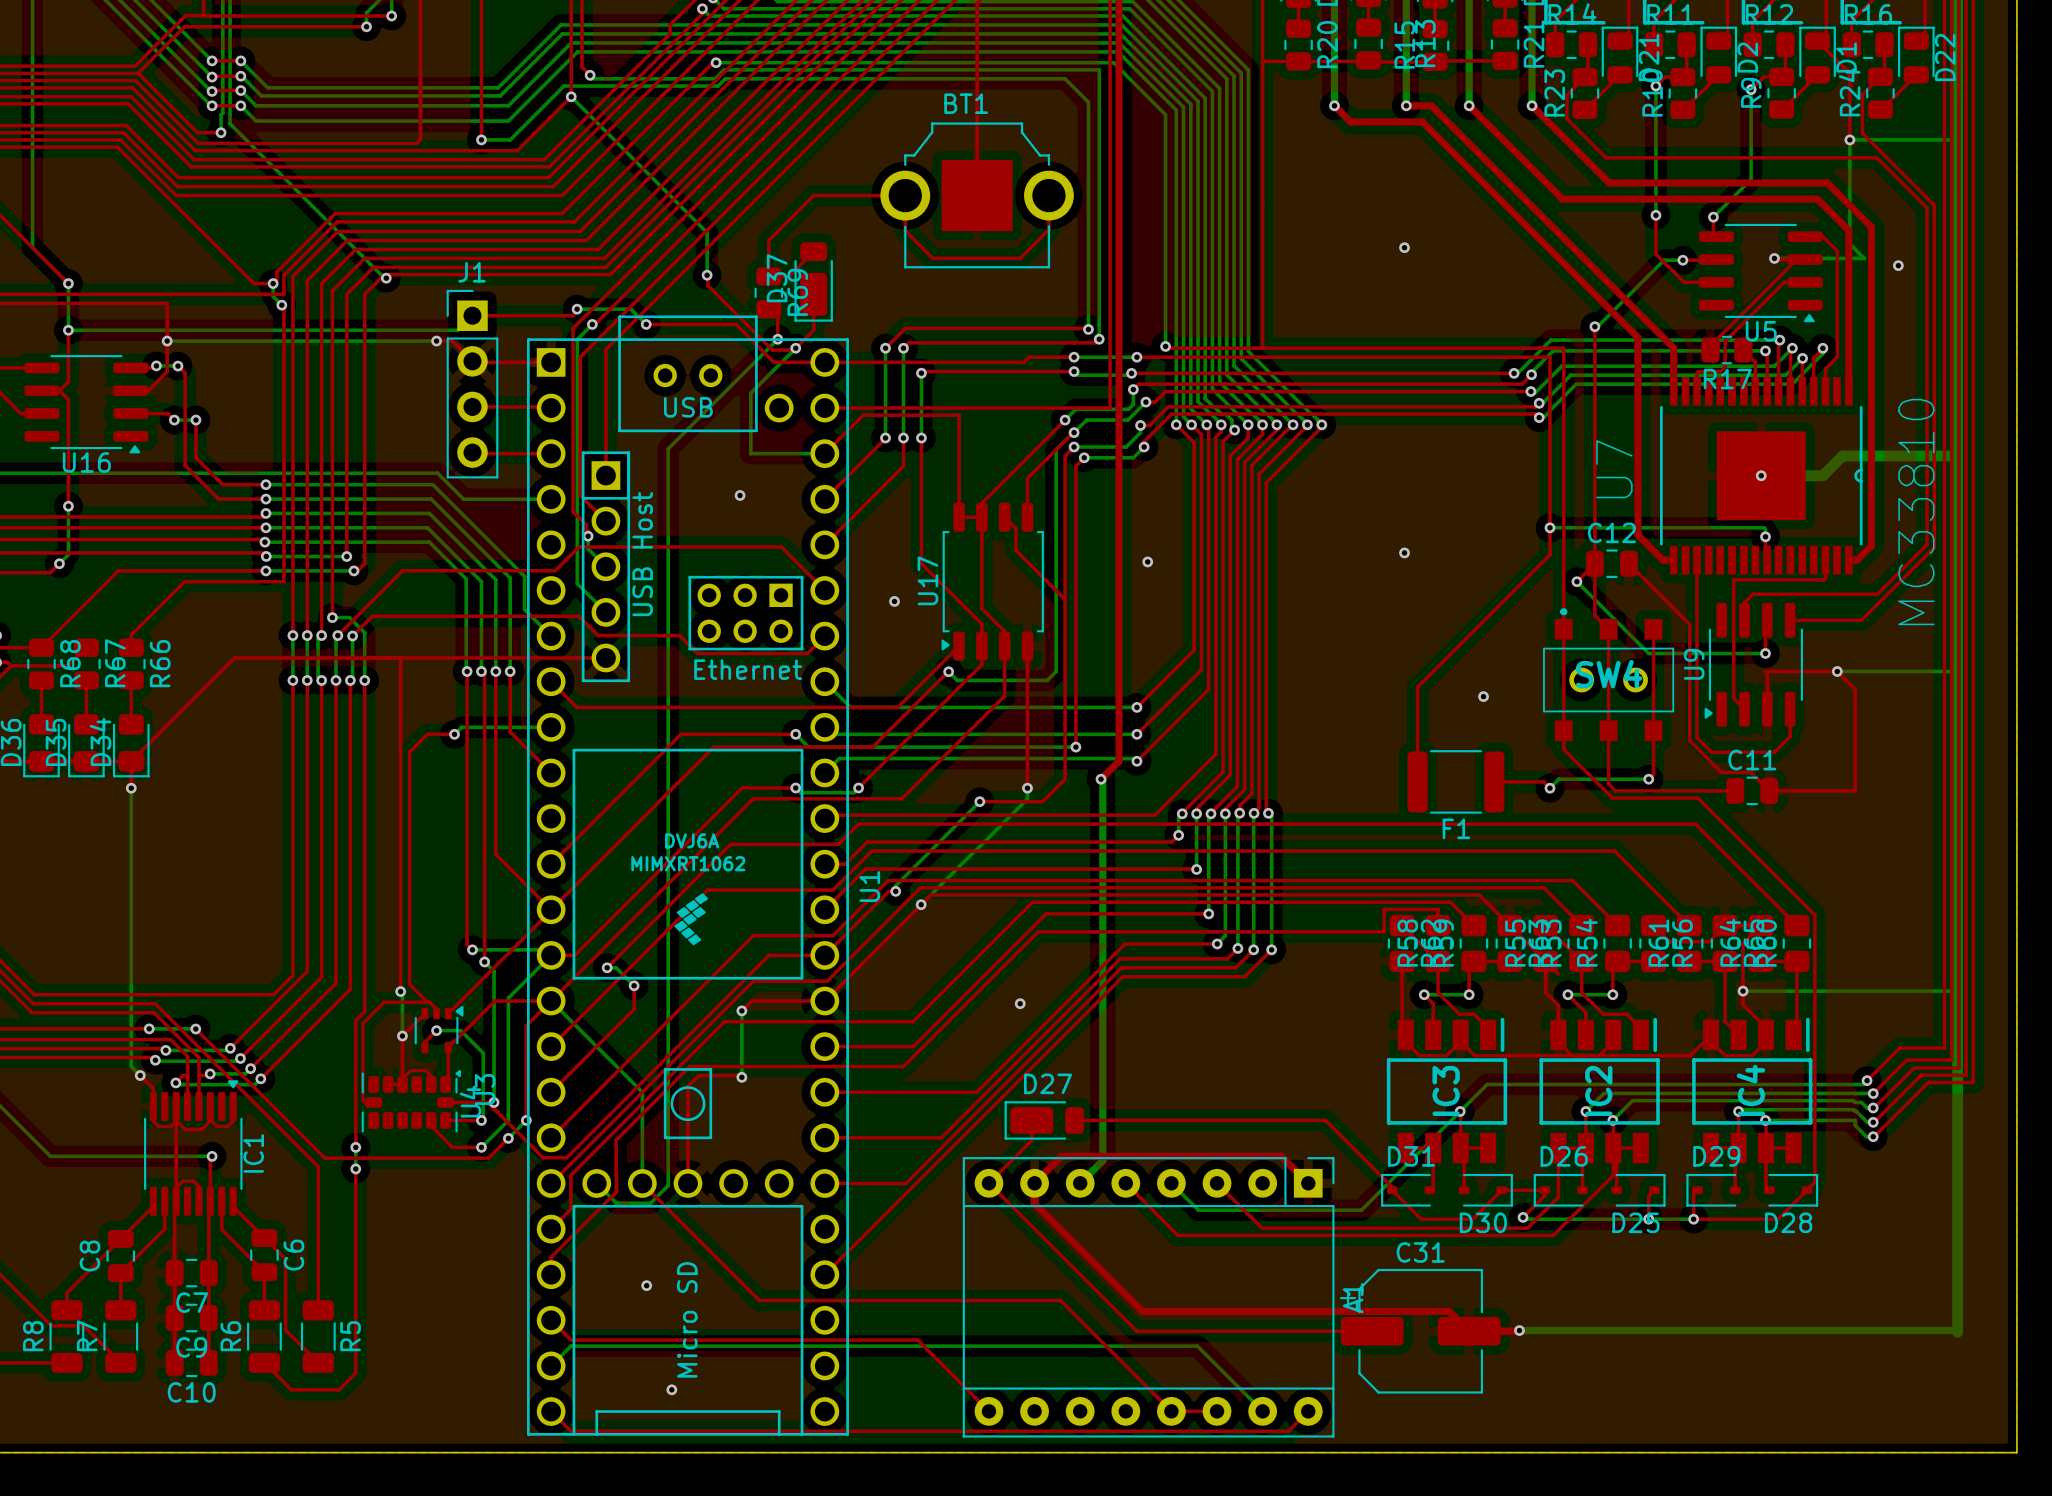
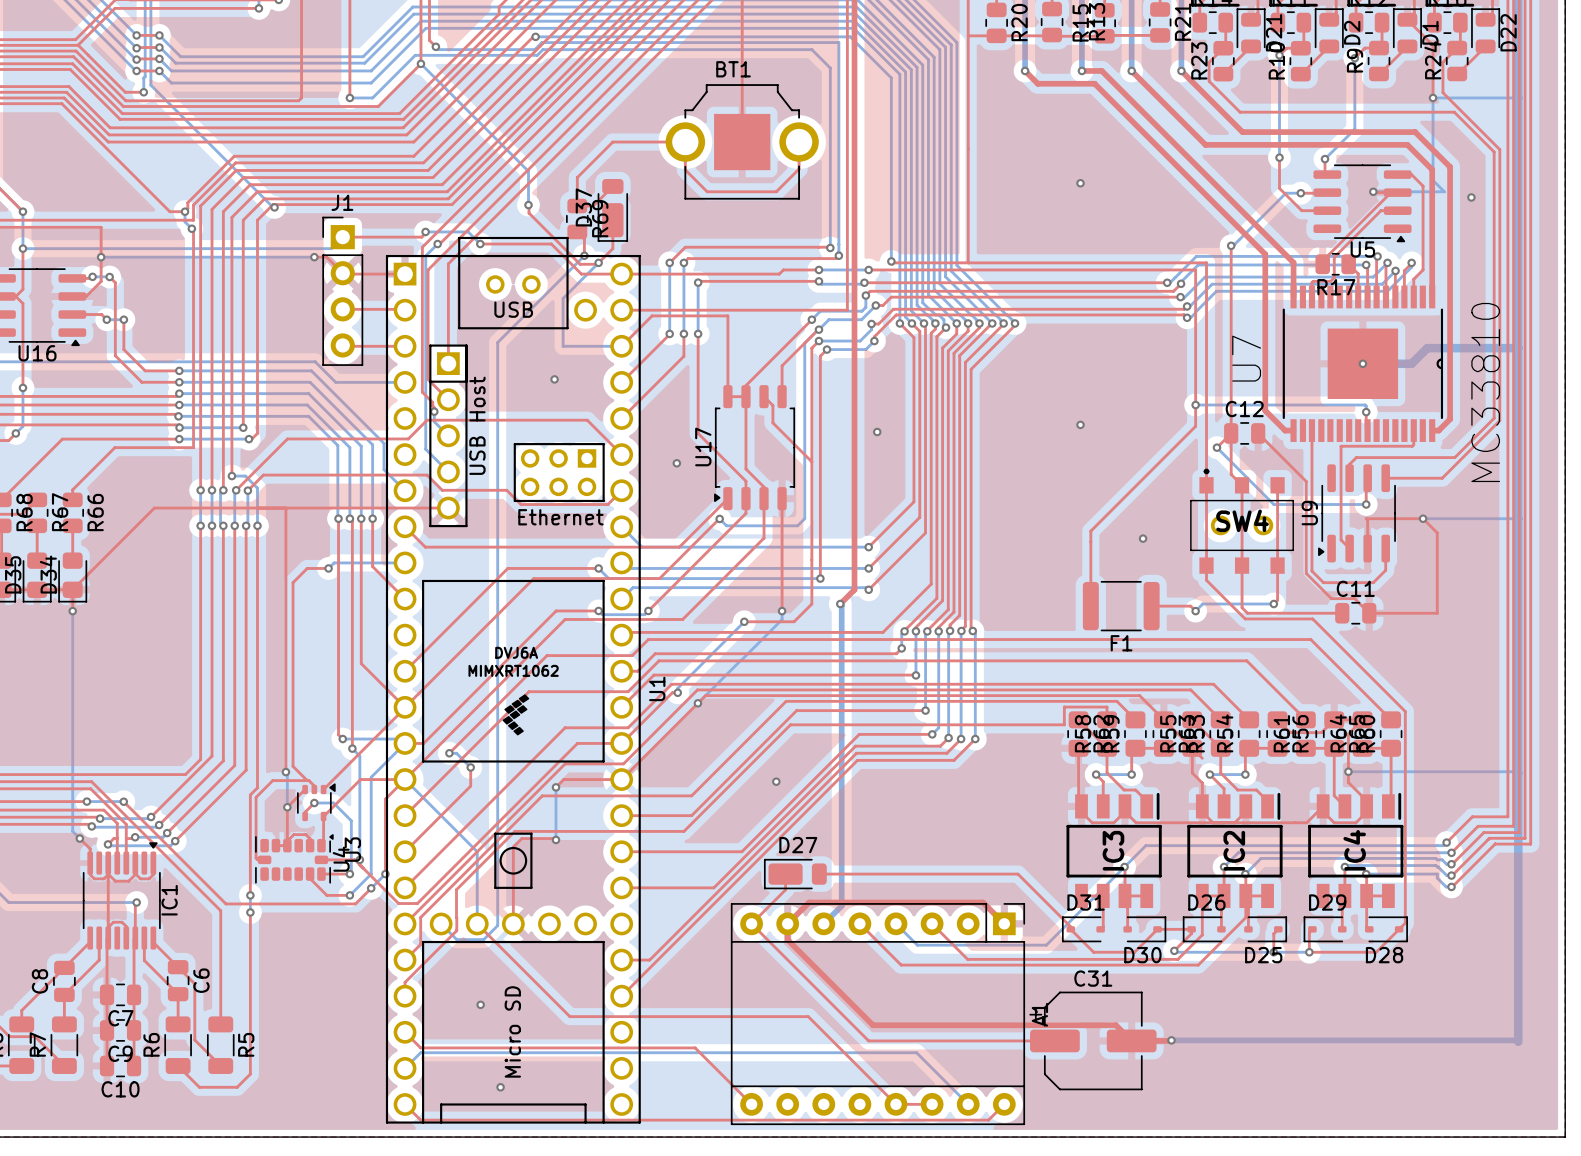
top track: (824, 1183) (905, 1183) -> (621, 960) (649, 960) (685, 923)

